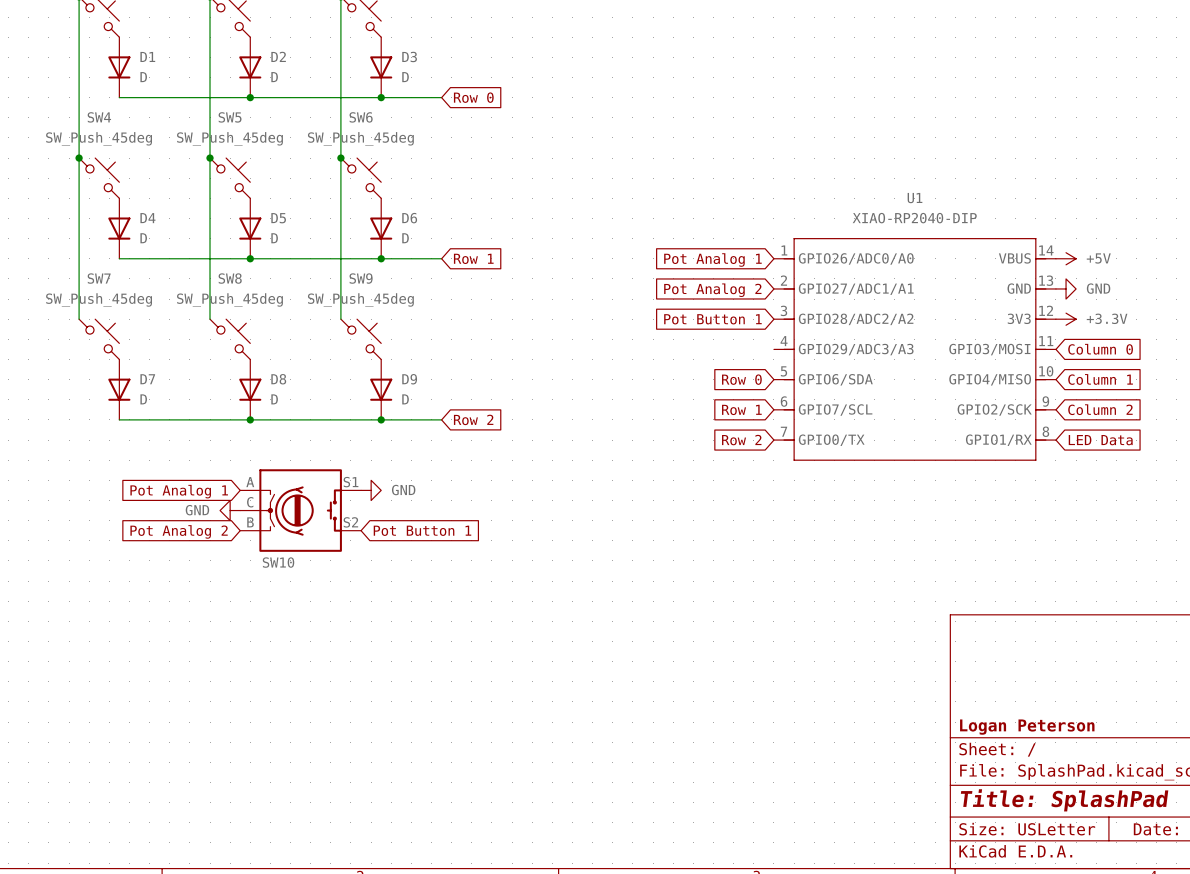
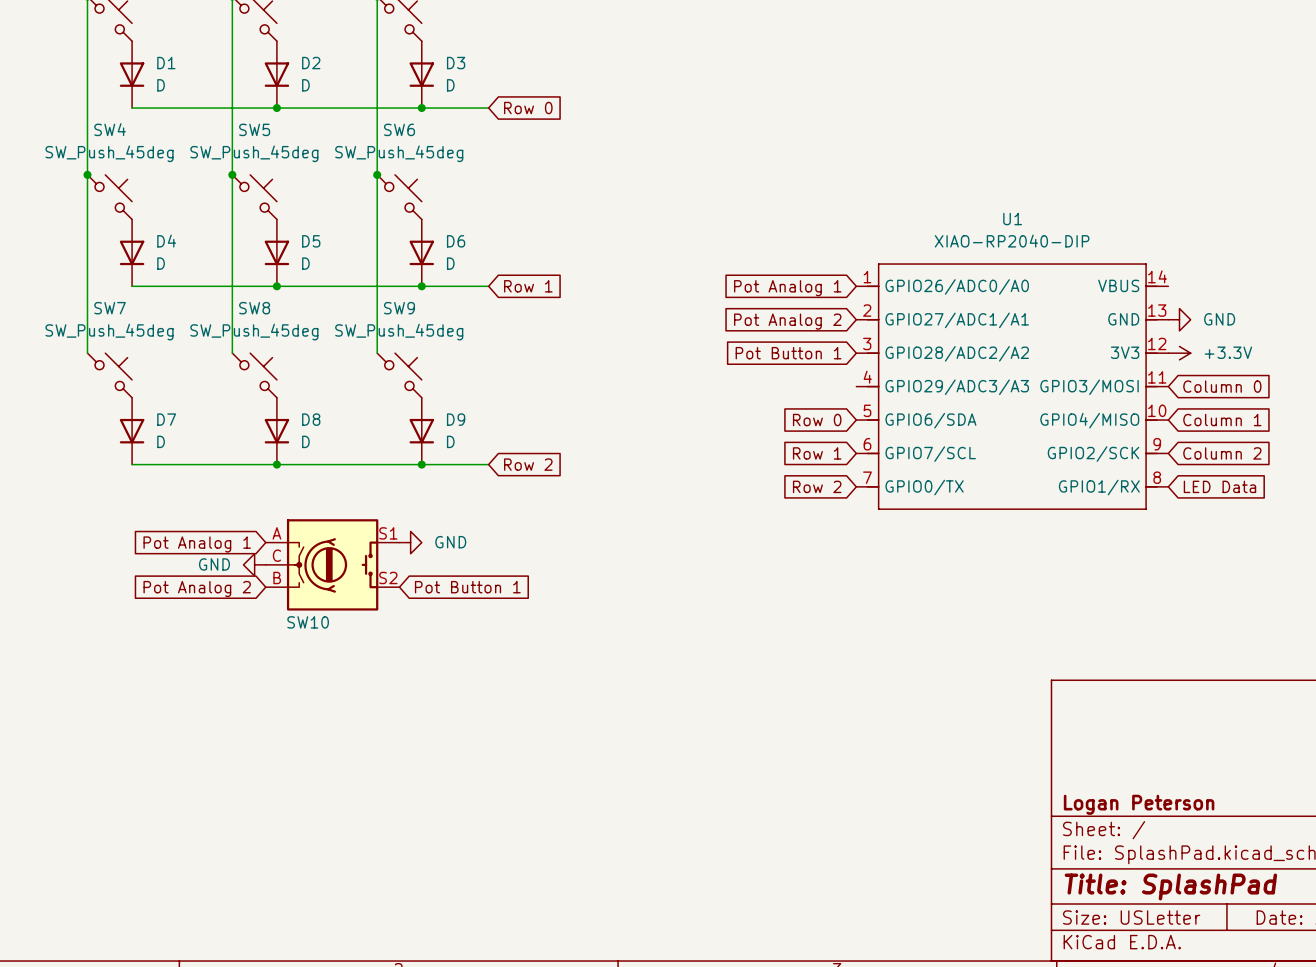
power symbol: +5V (1066, 258) -> none

